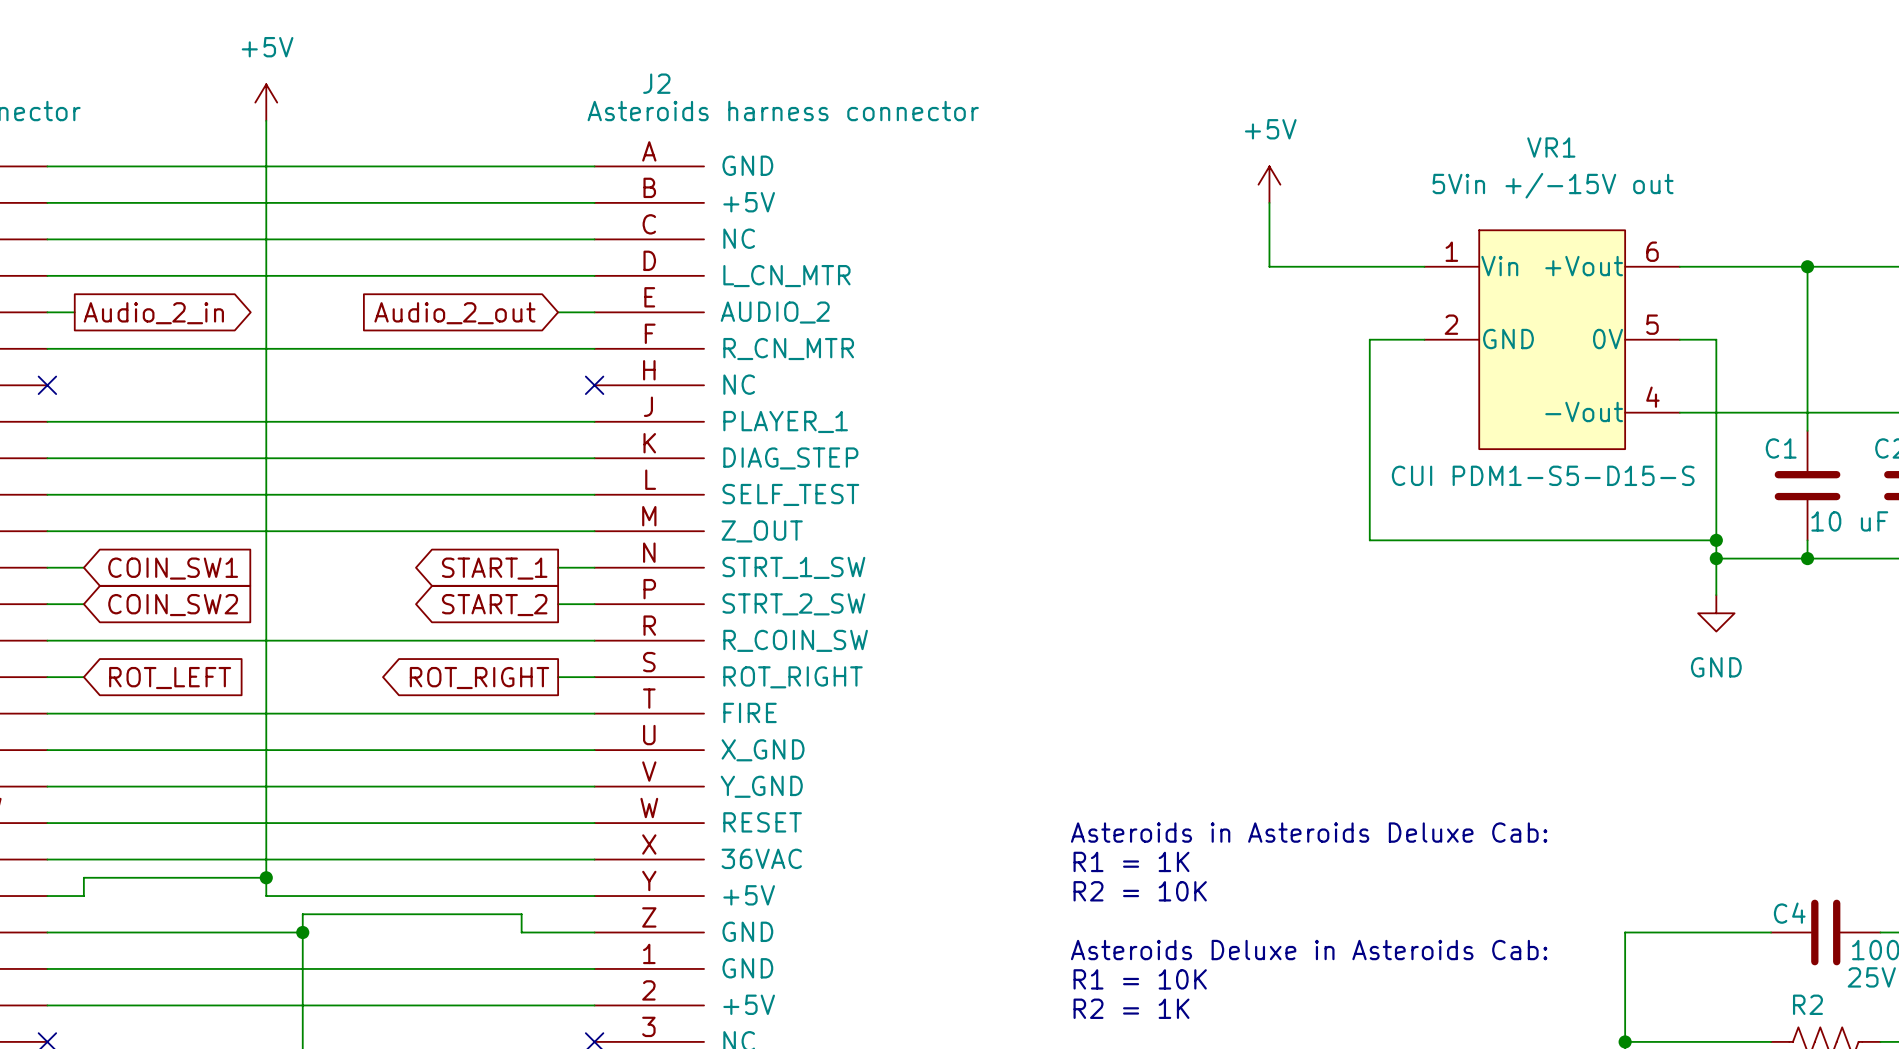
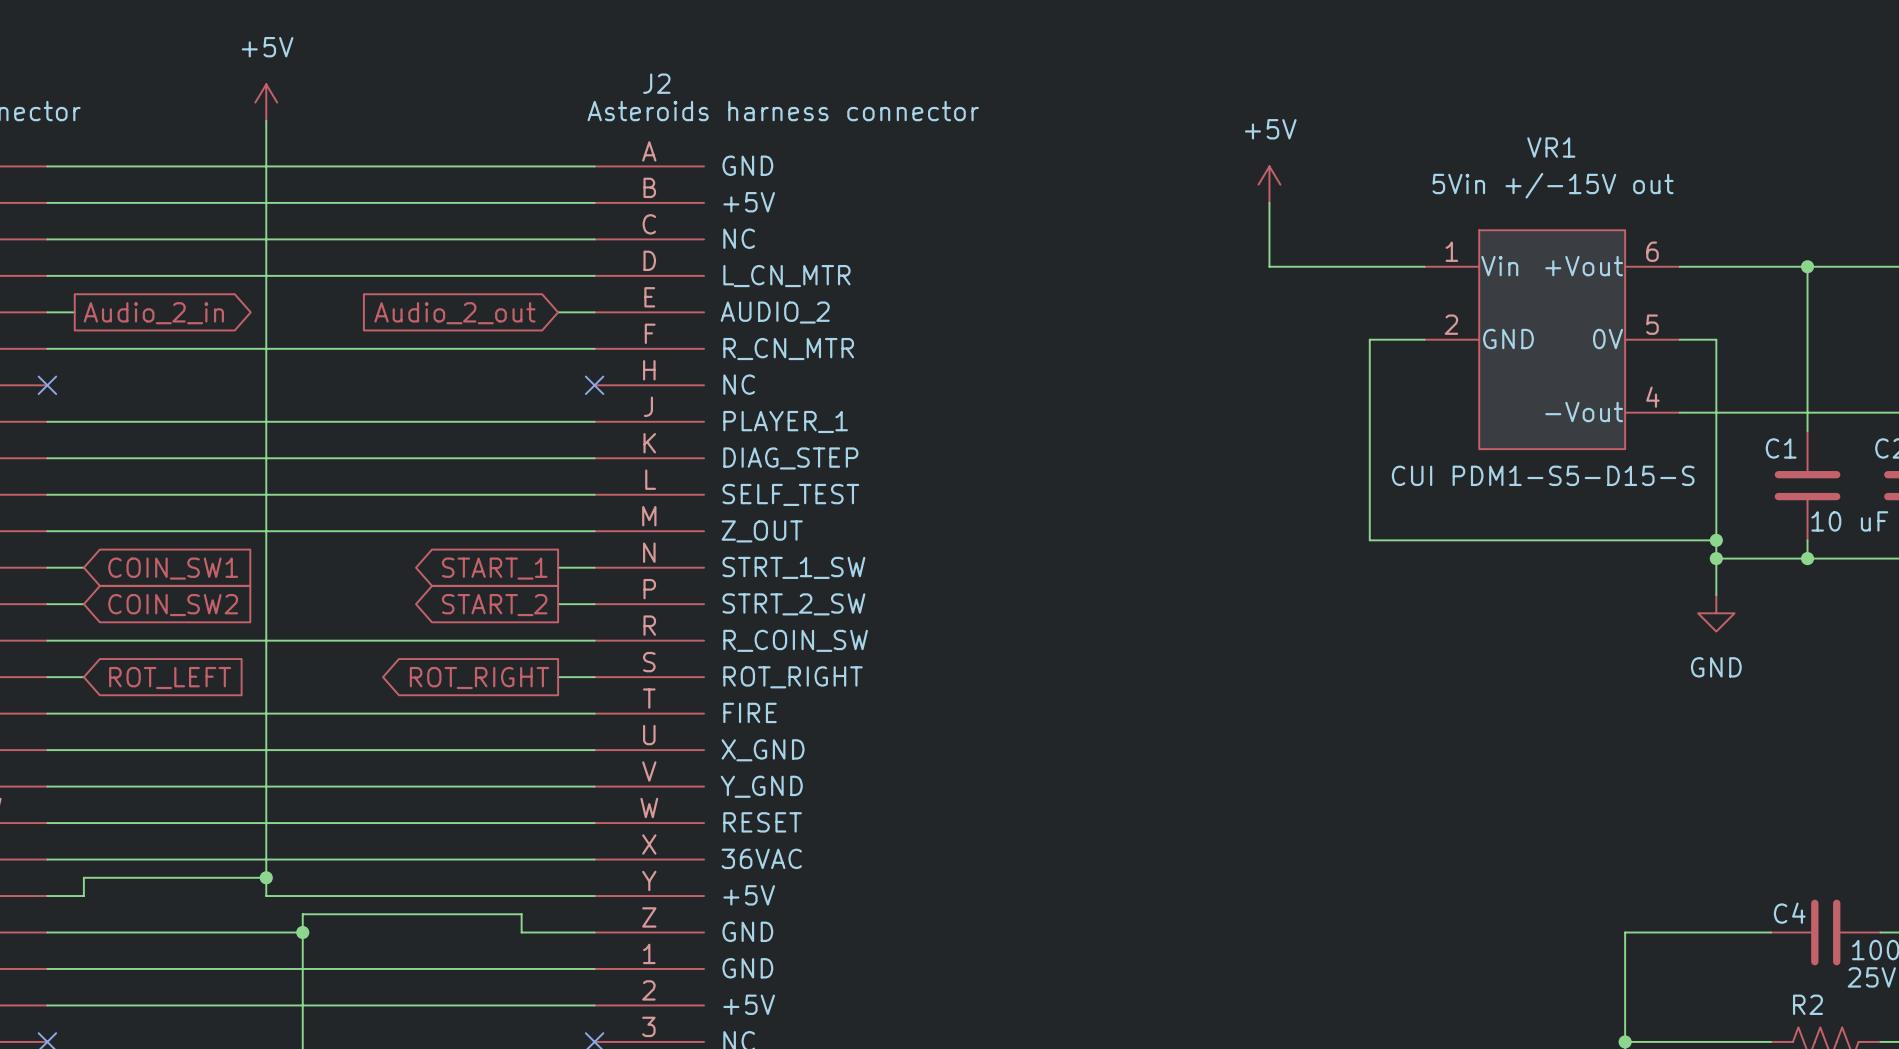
text: Asteroids in Asteroids Deluxe Cab: (1309, 832) -> none
text: R1 = 1K (1131, 861) -> none
text: R2 = 10K (1140, 891) -> none
text: Asteroids Deluxe in Asteroids Cab: (1309, 950) -> none
text: R1 = 10K (1140, 979) -> none
text: R2 = 1K (1131, 1008) -> none

